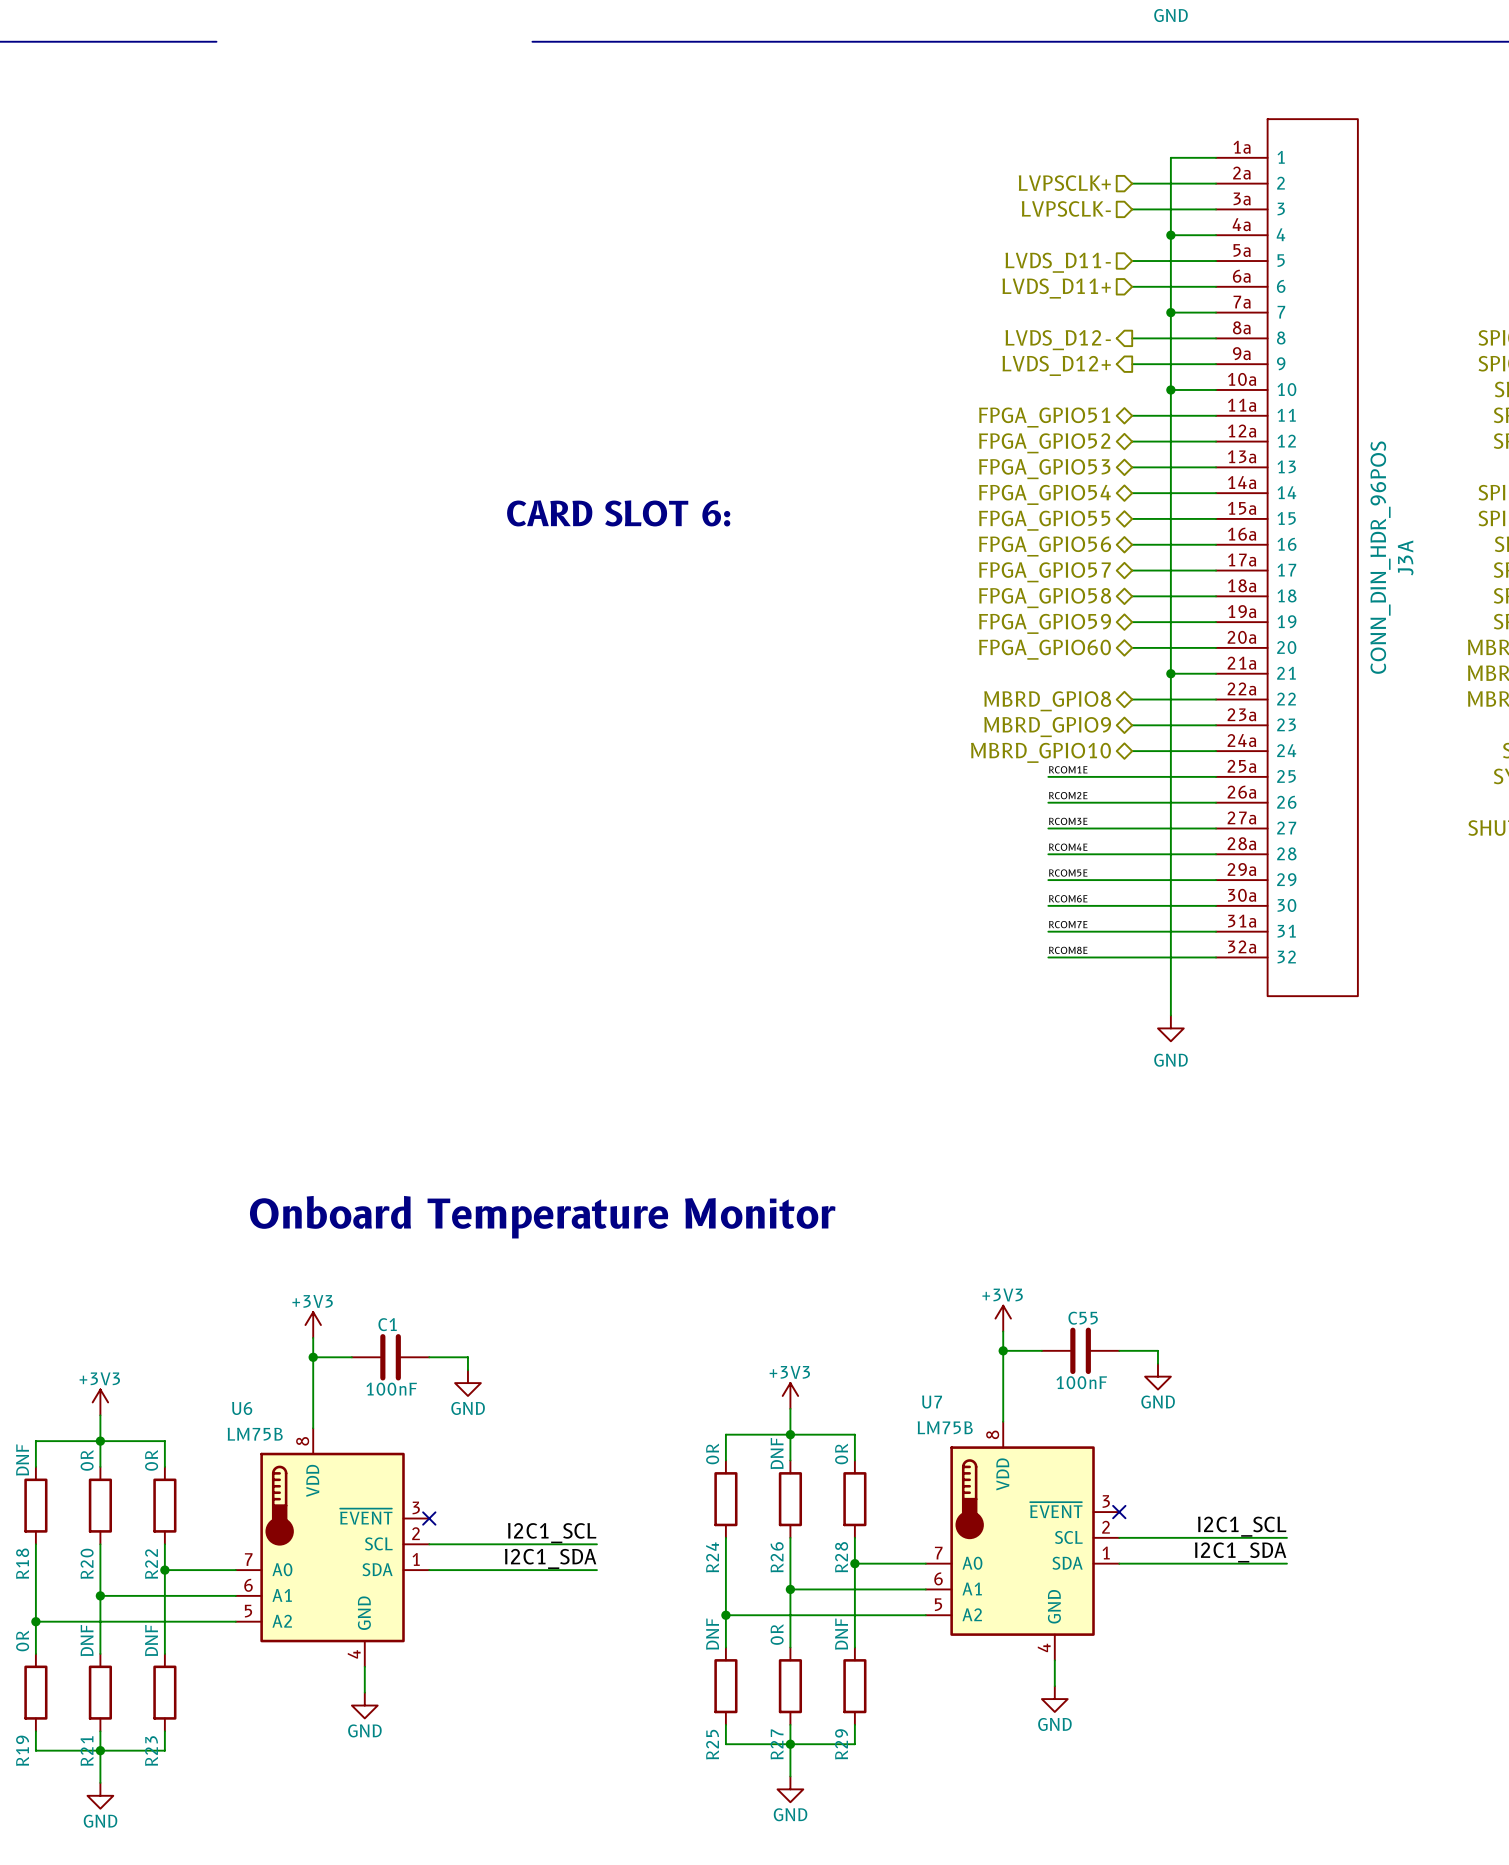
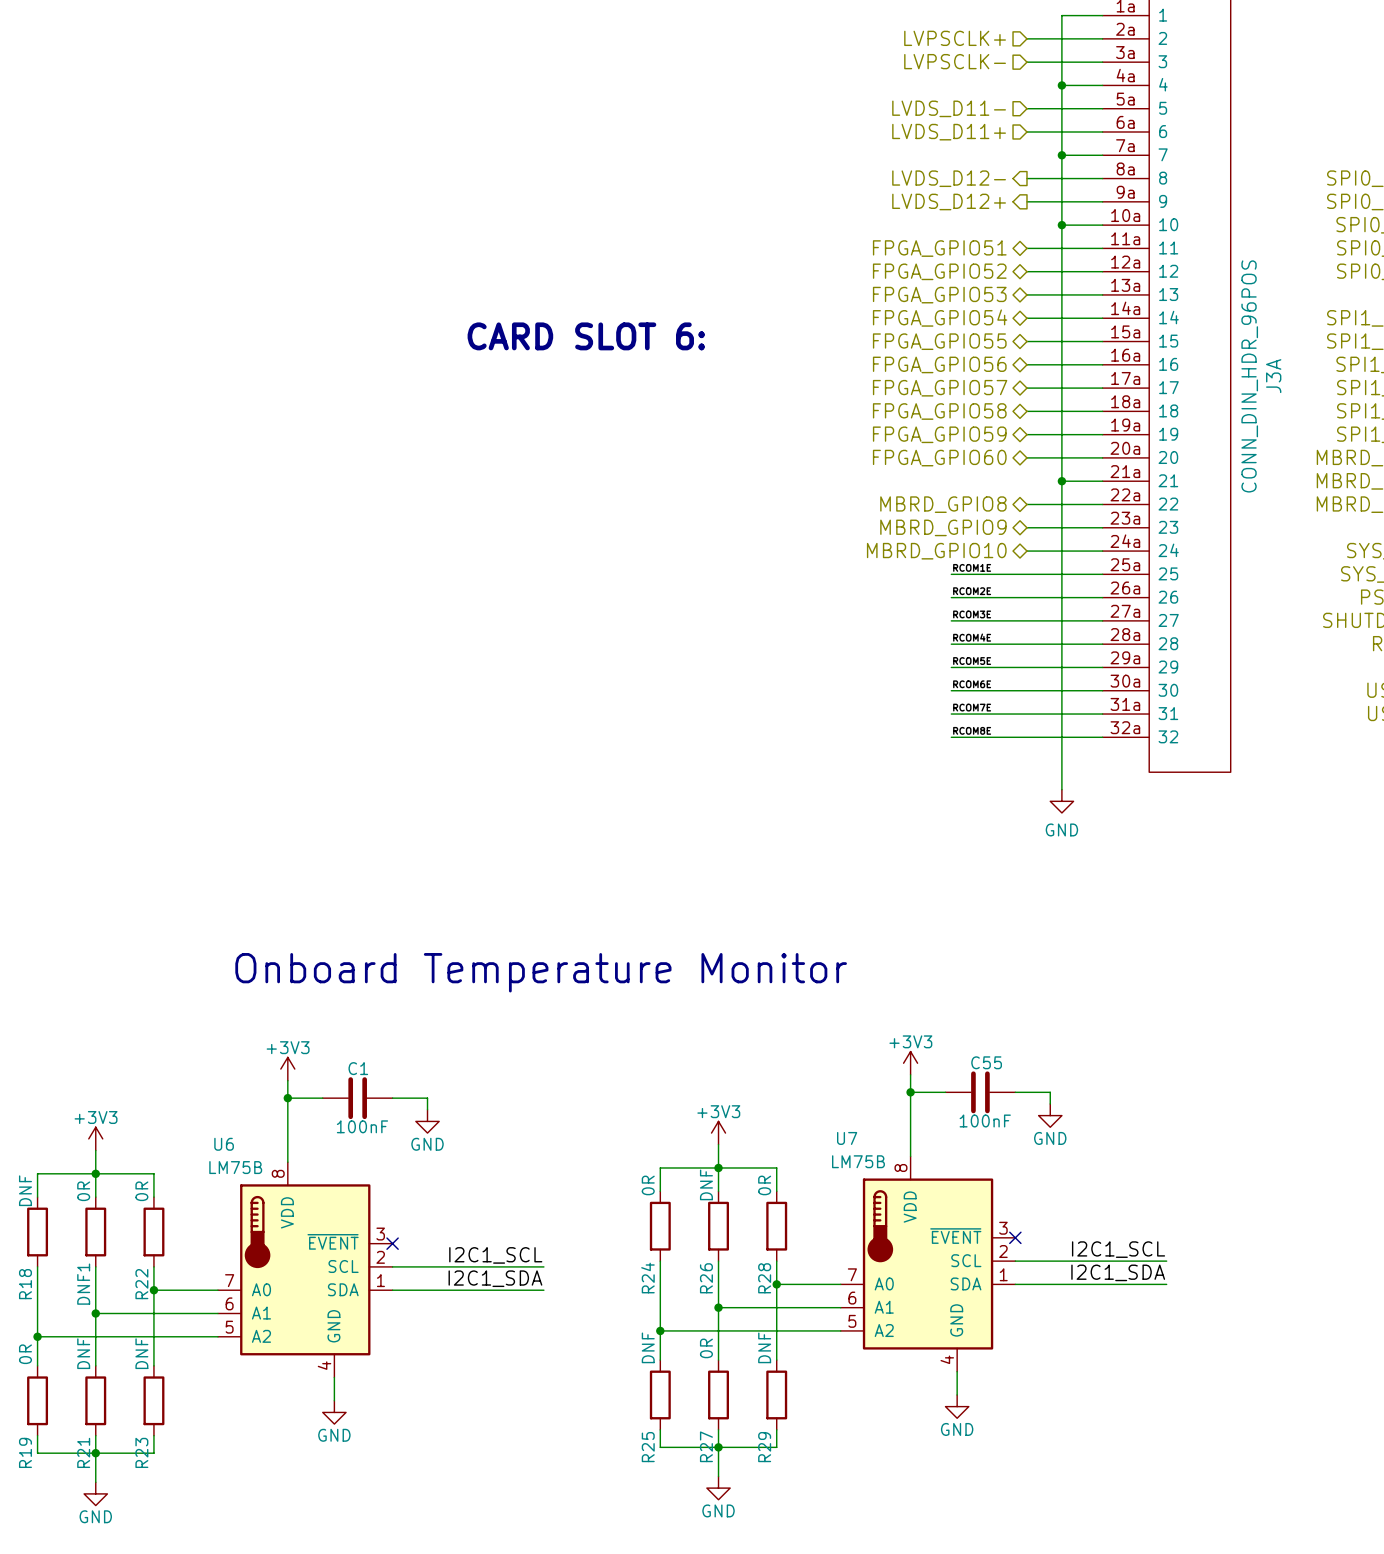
R20 name: R20 (87, 1563) -> DNF1 (83, 1284)

